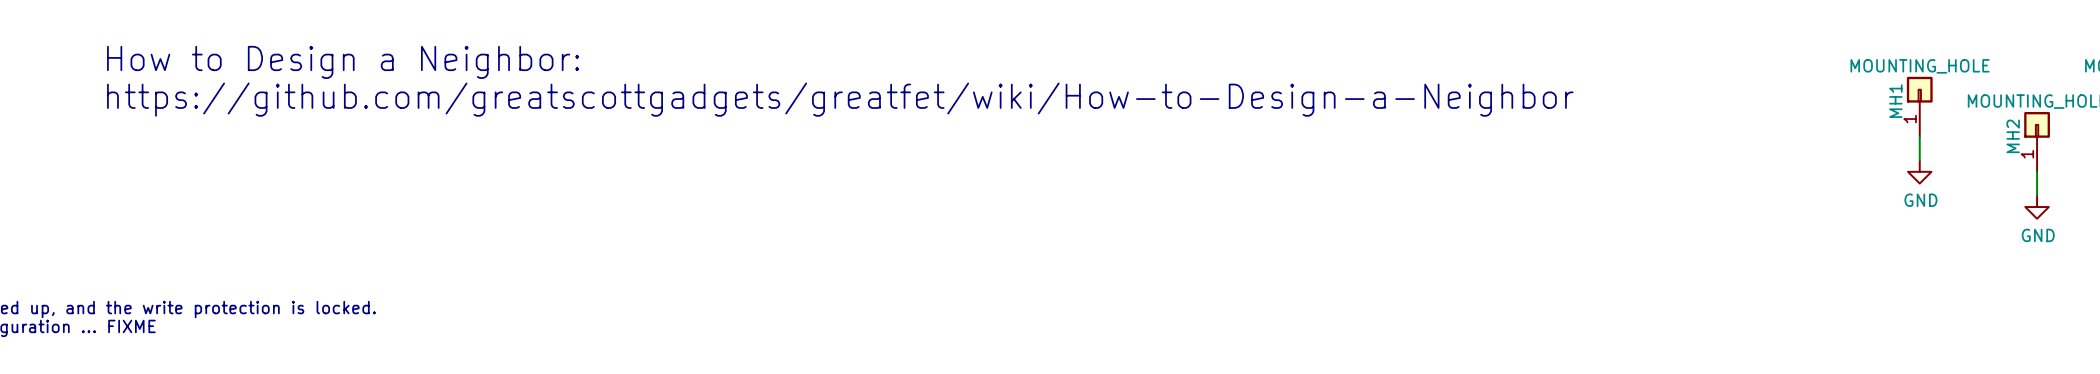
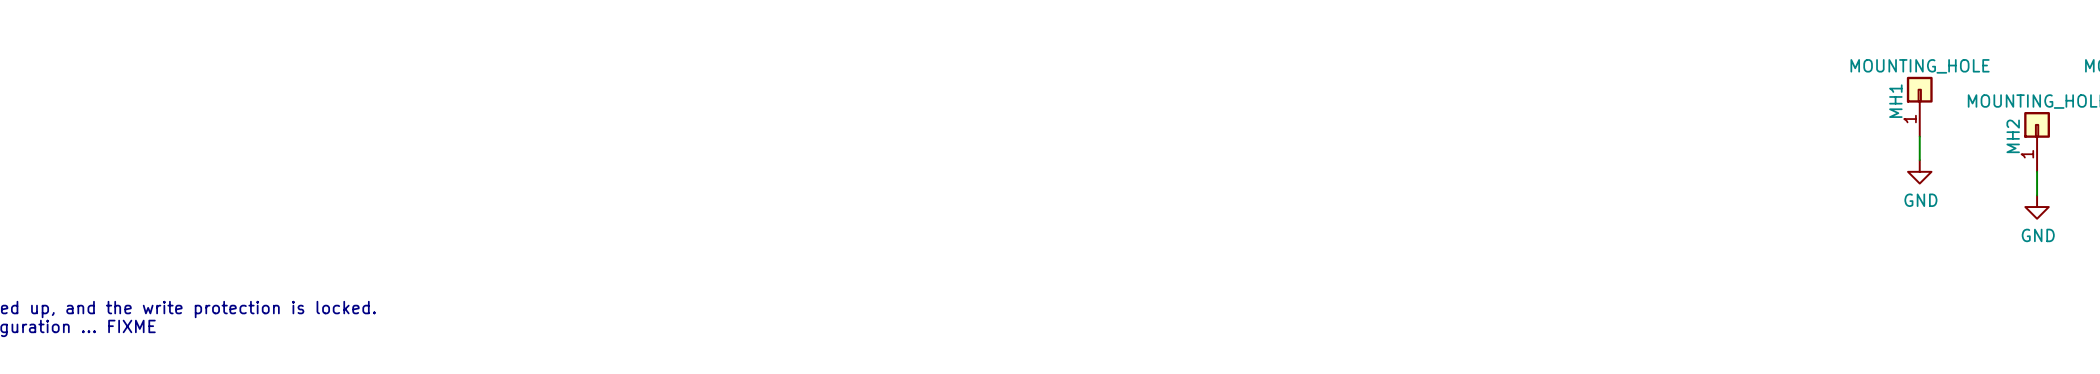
text: How to Design a Neighbor: (343, 62) -> none
text: https://github.com/greatscottgadgets/greatfet/wiki/How-to-Design-a-Neighbor (840, 99) -> none

